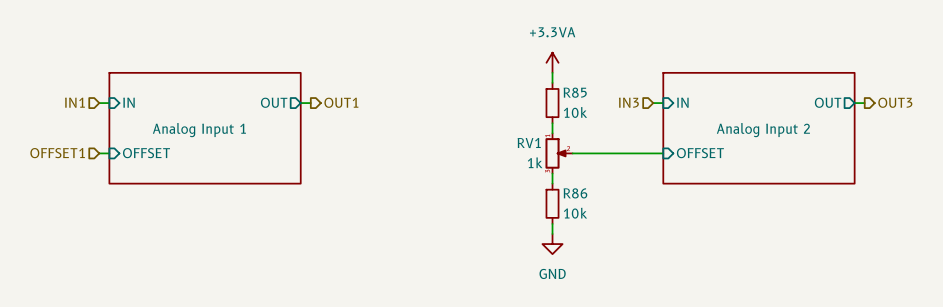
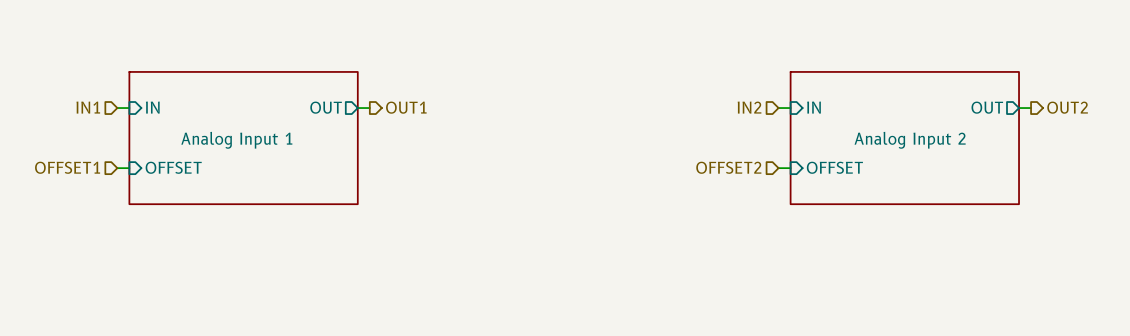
power symbol: +3.3VA (552, 62) -> none
wire: (552, 72) (552, 82) -> none
hierarchical label: IN3 (628, 102) -> IN2 (749, 107)
hierarchical label: OUT3 (895, 102) -> OUT2 (1067, 107)
R85: 10k (552, 103) -> none
wire: (552, 123) (552, 133) -> none
RV1: 1k (559, 153) -> none
wire: (572, 153) (653, 153) -> none
hierarchical label: none -> OFFSET2 (728, 167)
wire: (552, 173) (552, 183) -> none
R86: 10k (552, 203) -> none
wire: (552, 223) (552, 233) -> none
power symbol: GND (552, 244) -> none

